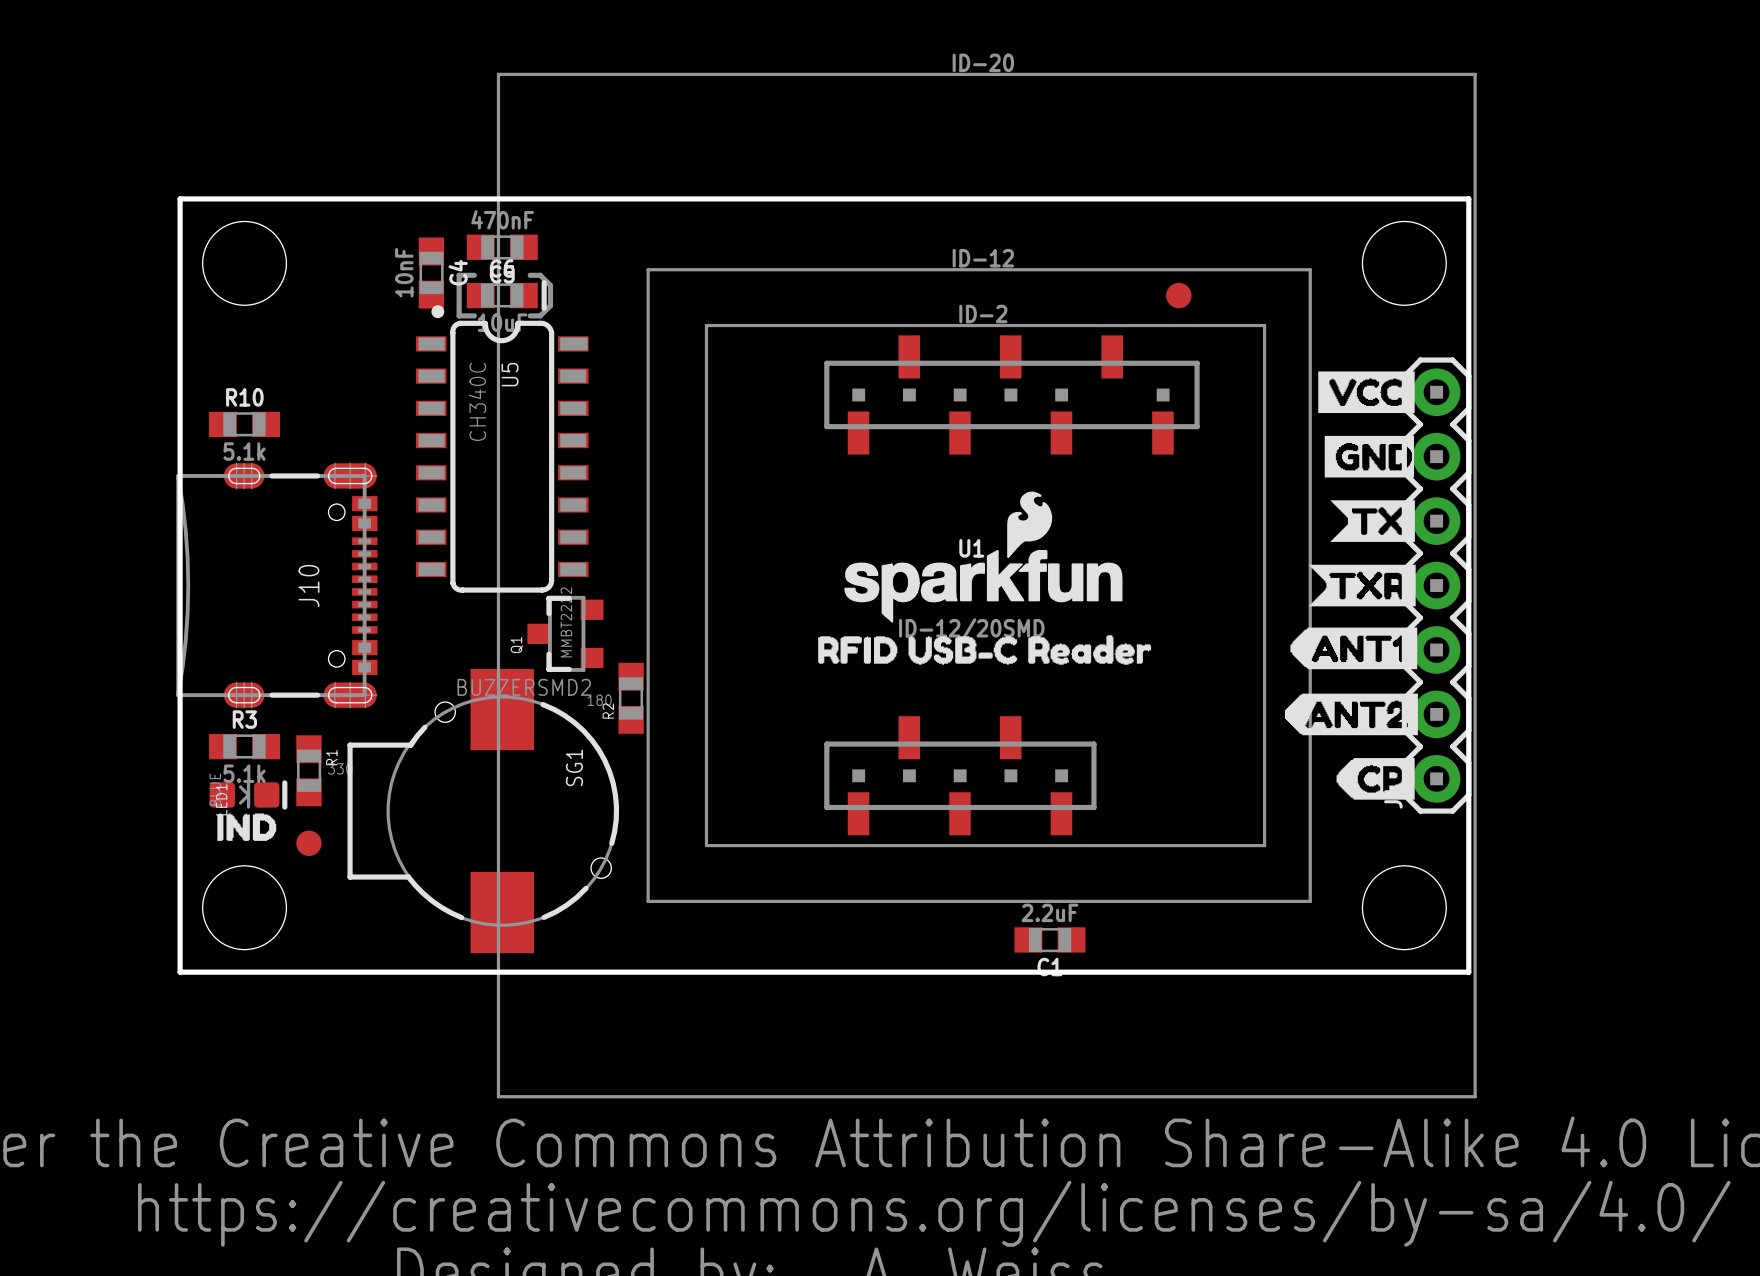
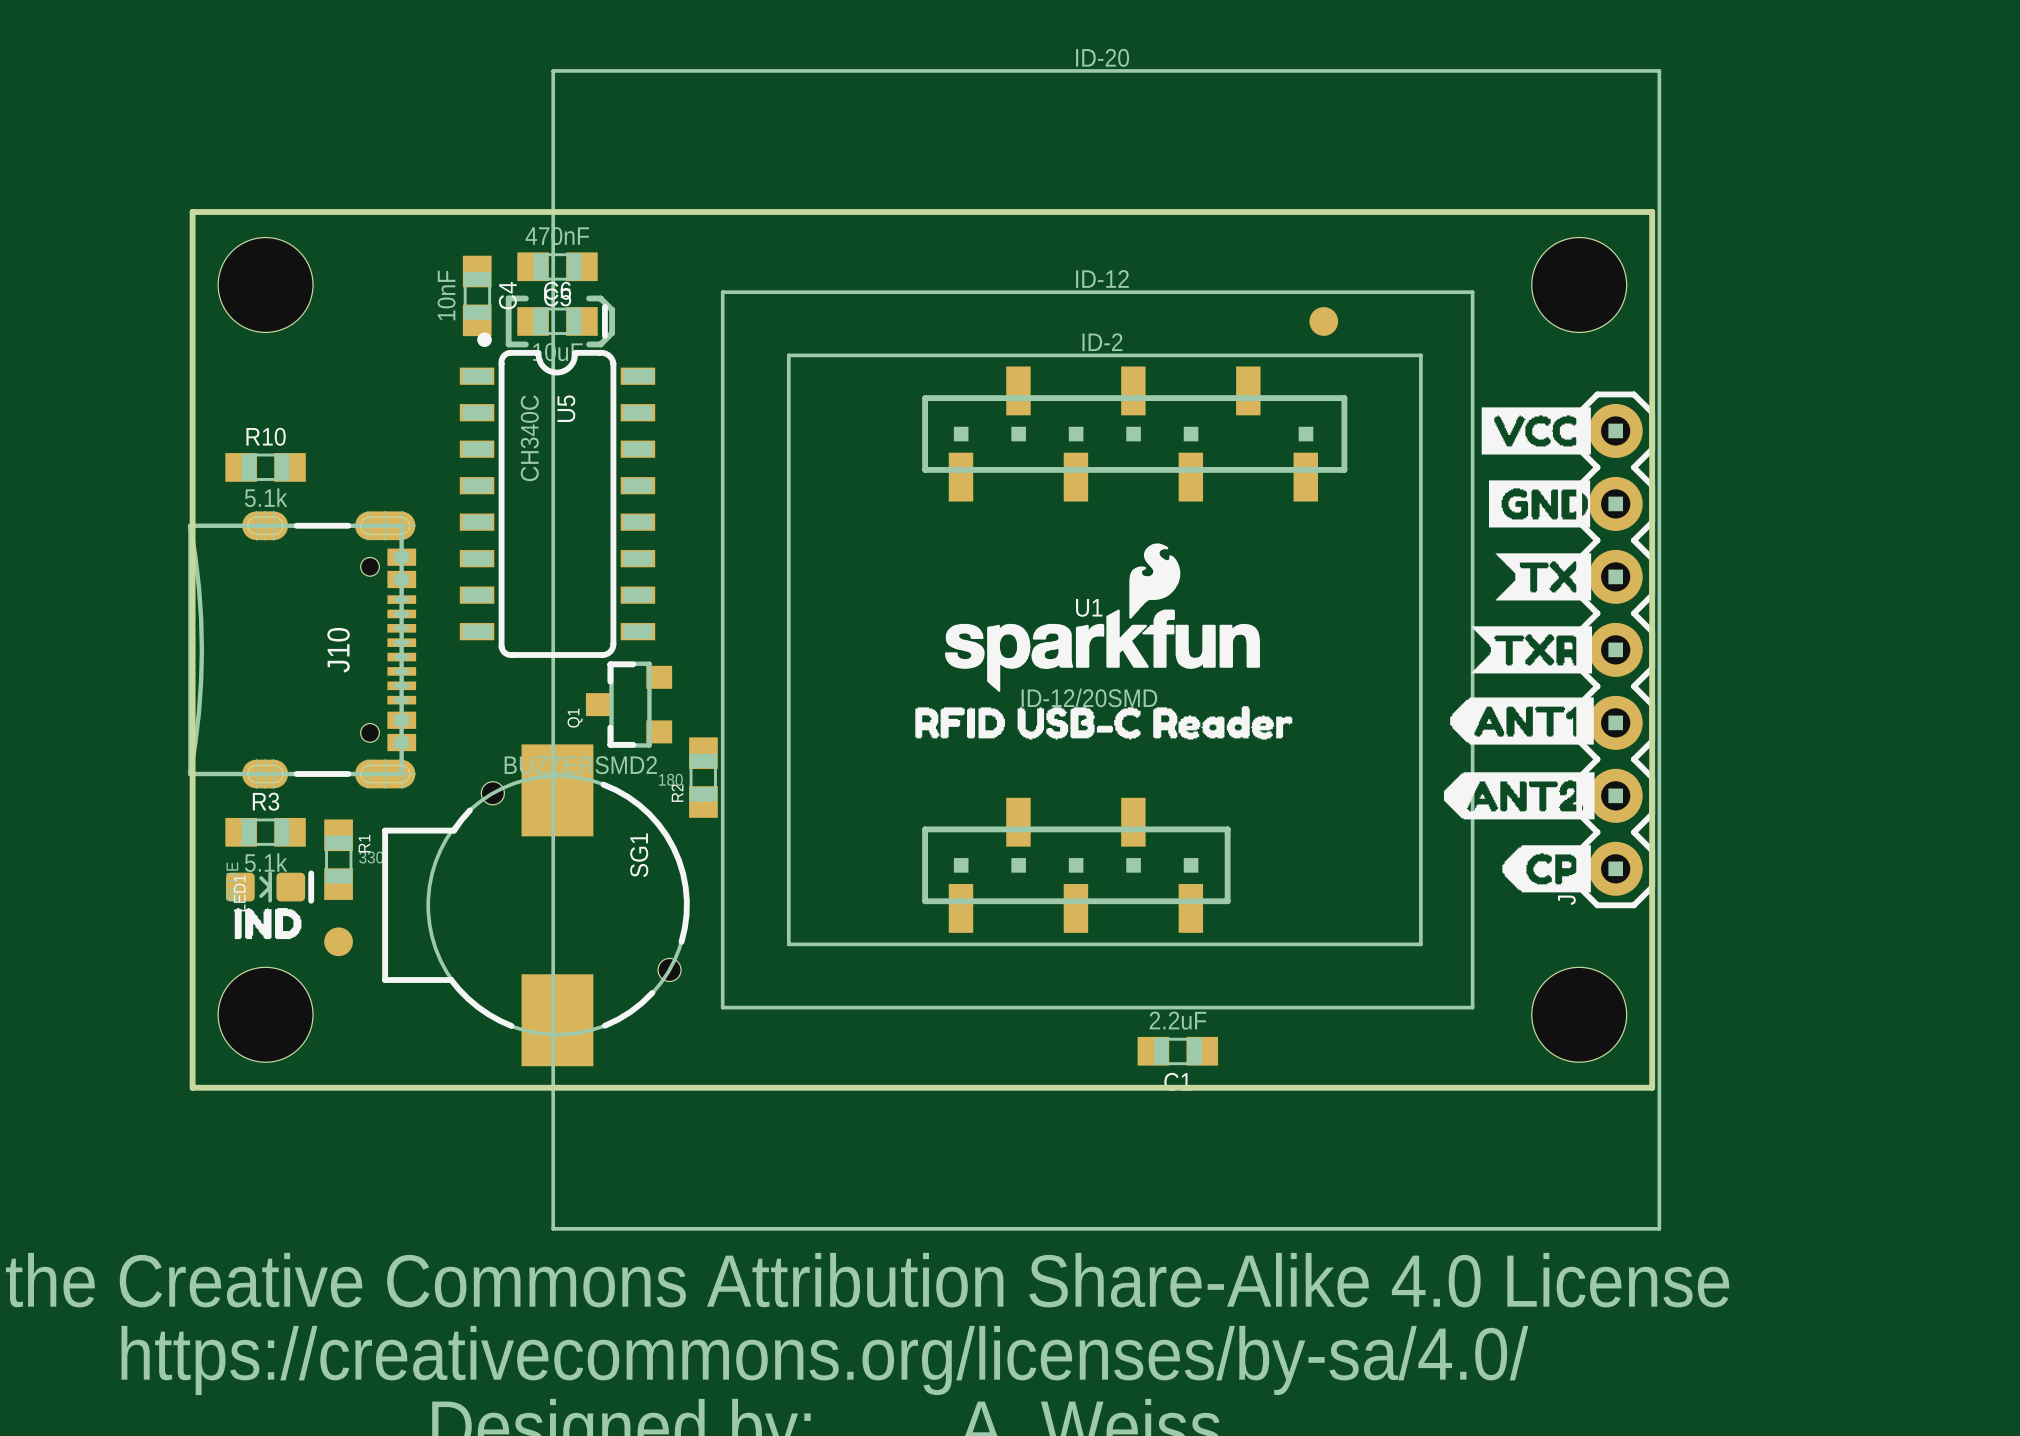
Q1 value: MMBT2222 (566, 622) -> none

